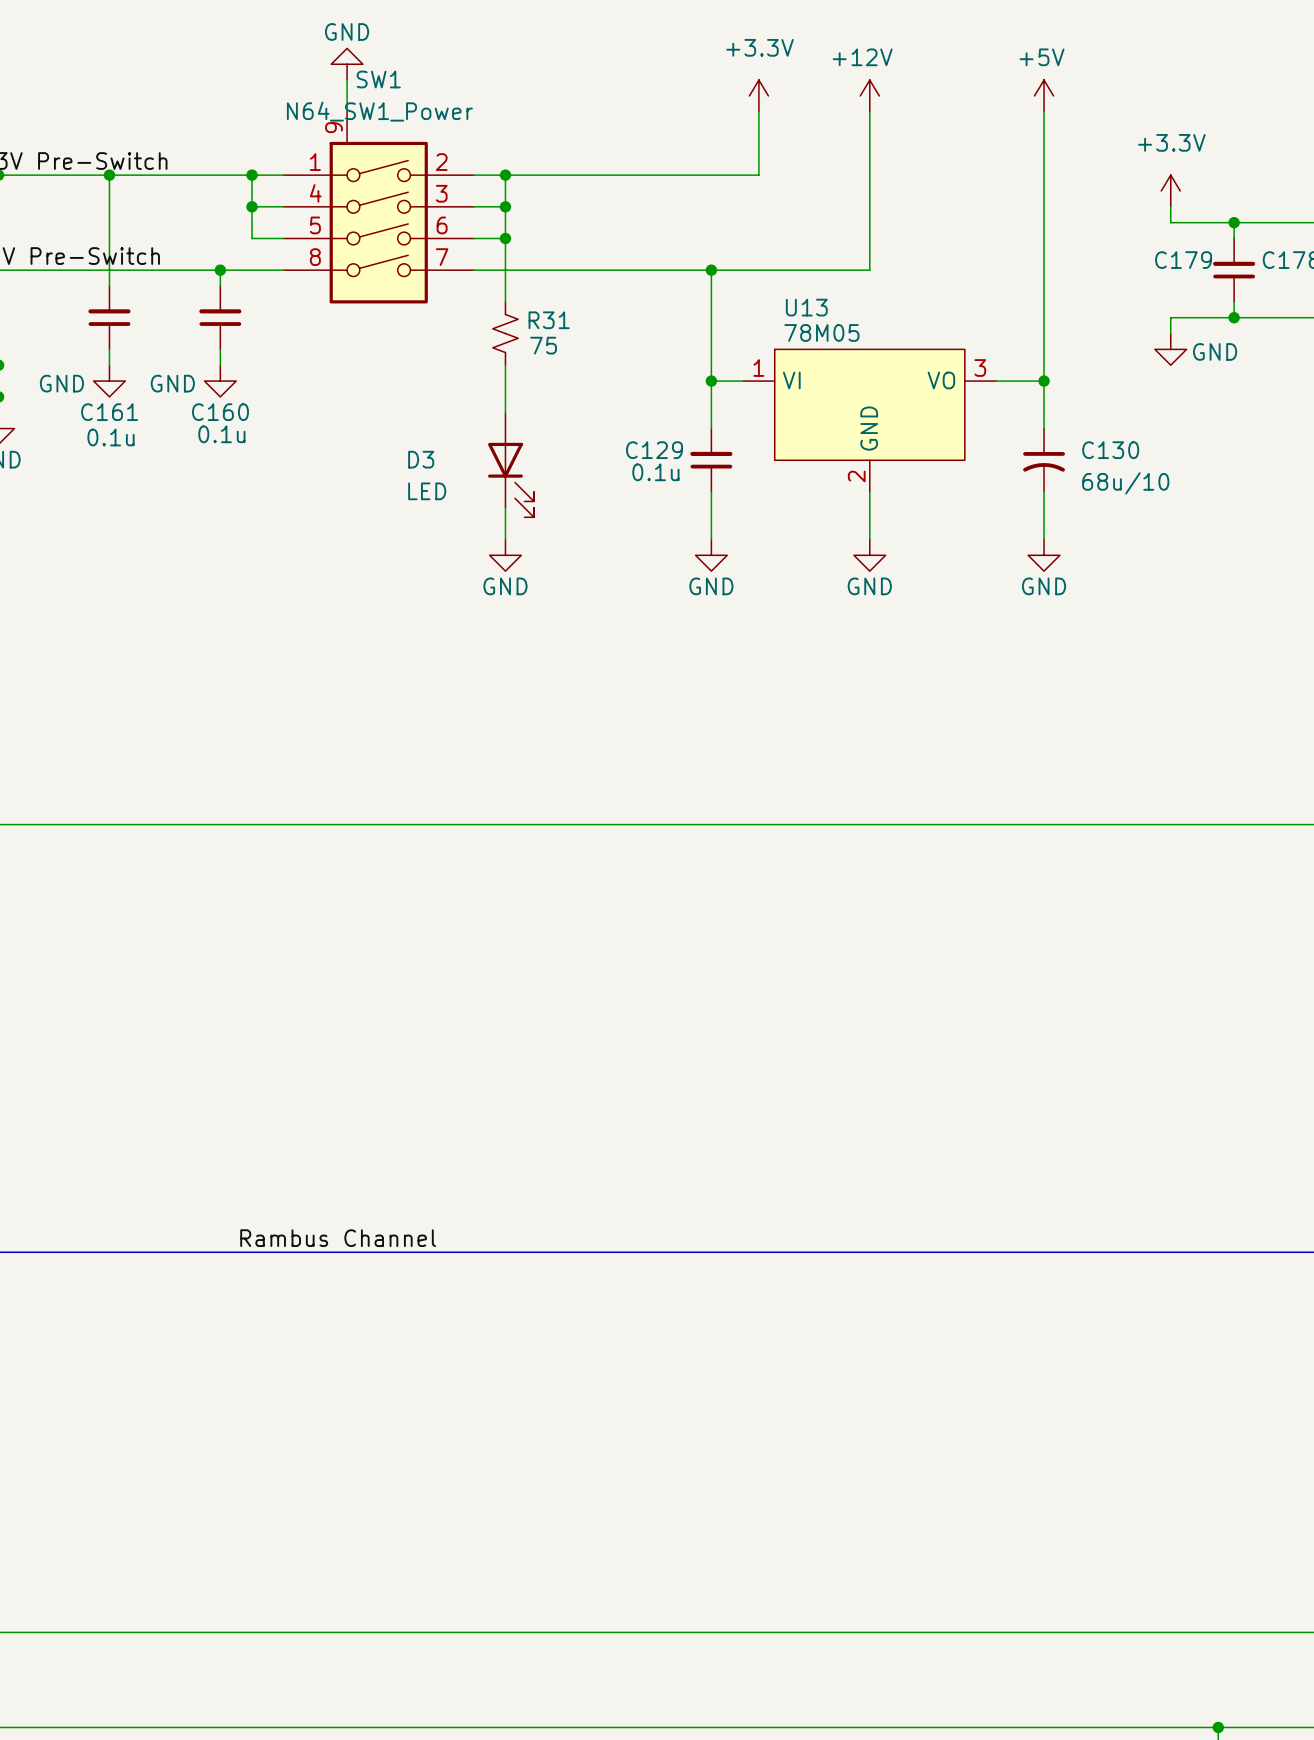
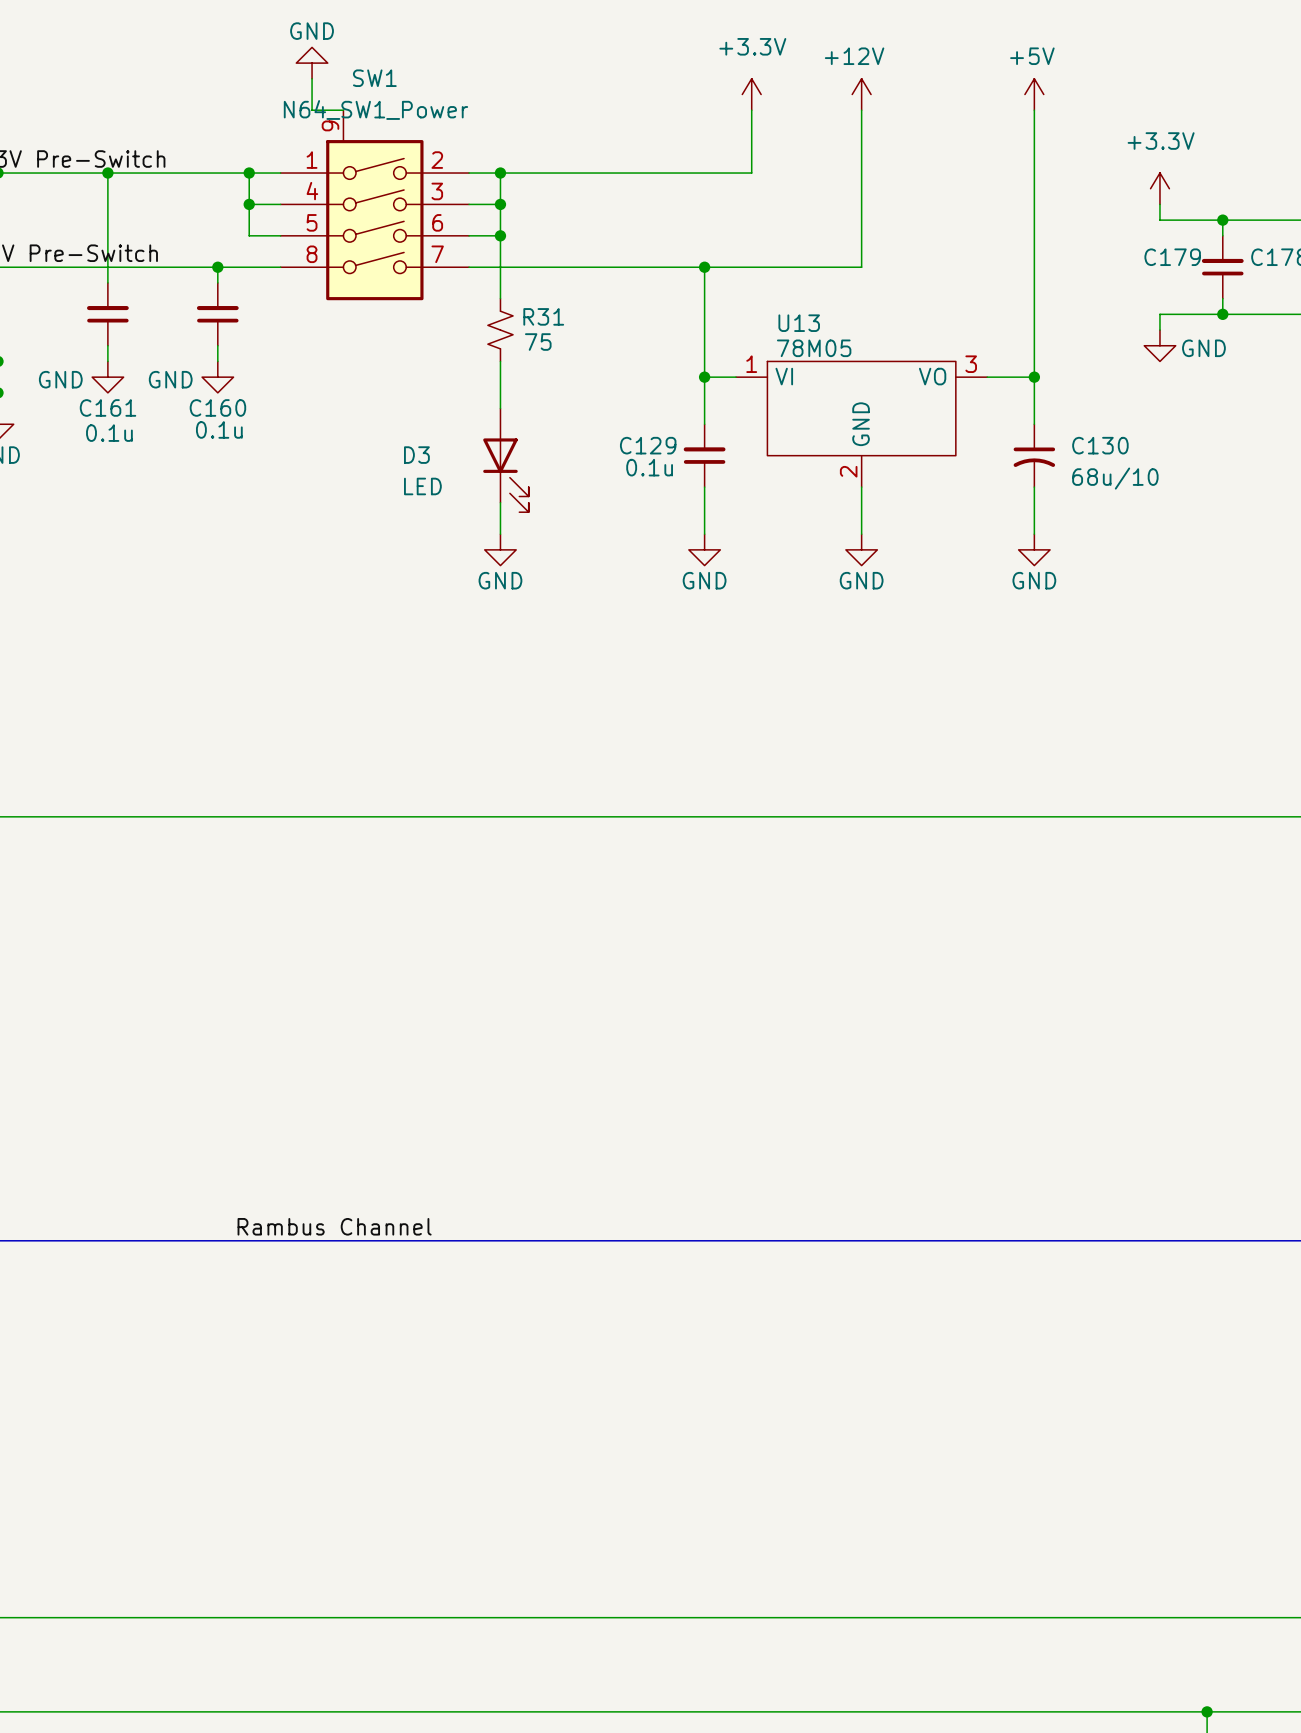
power symbol position: GND (347, 64) -> GND (312, 63)
wire: (347, 80) (347, 111) -> (312, 78) (312, 110) (343, 110)
U13 symbol: [743, 349, 997, 492] -> [736, 361, 988, 488]

